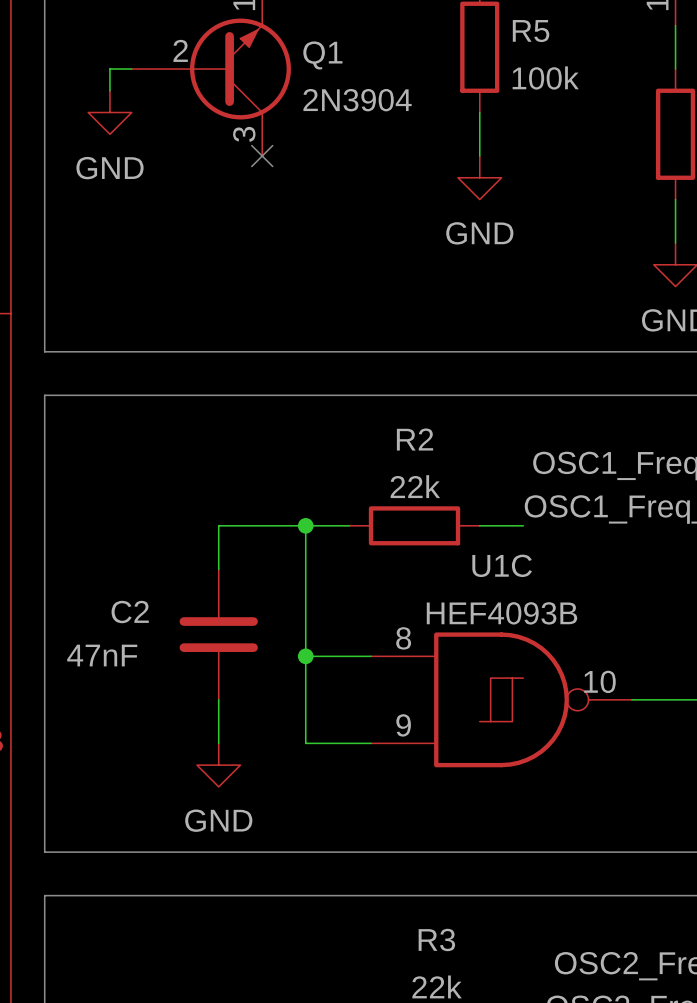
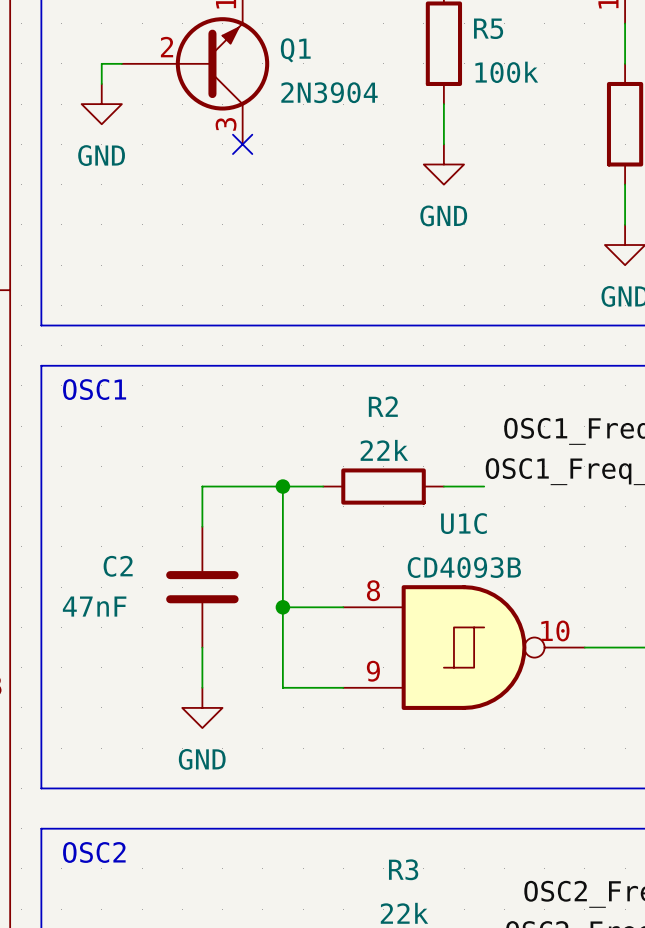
text: none -> OSC1 (94, 389)
U1C value: HEF4093B (501, 613) -> CD4093B (464, 567)
text: none -> OSC2 (94, 852)

